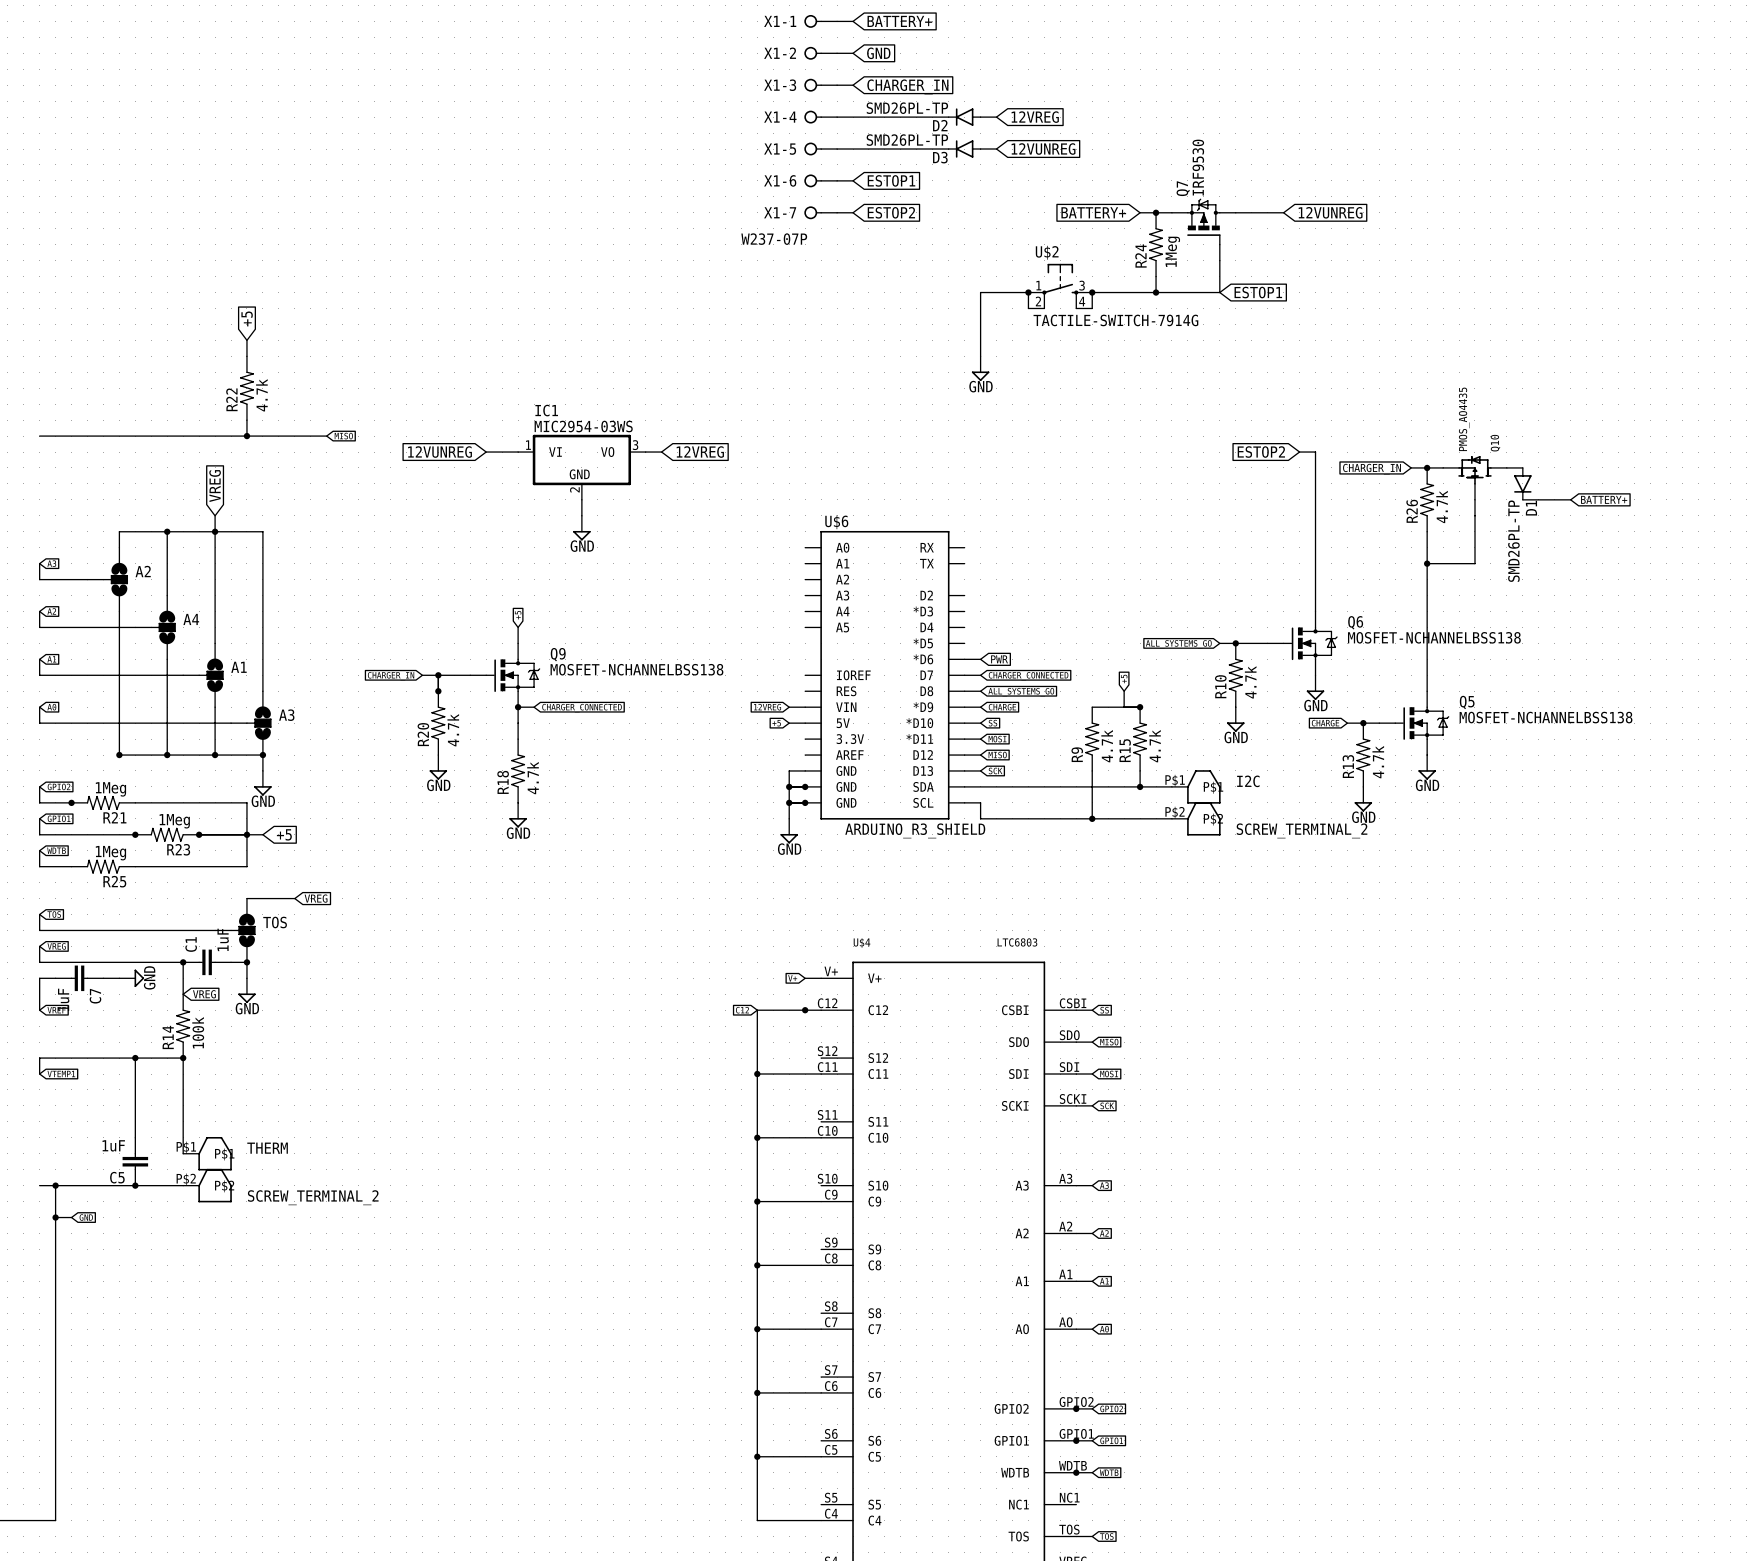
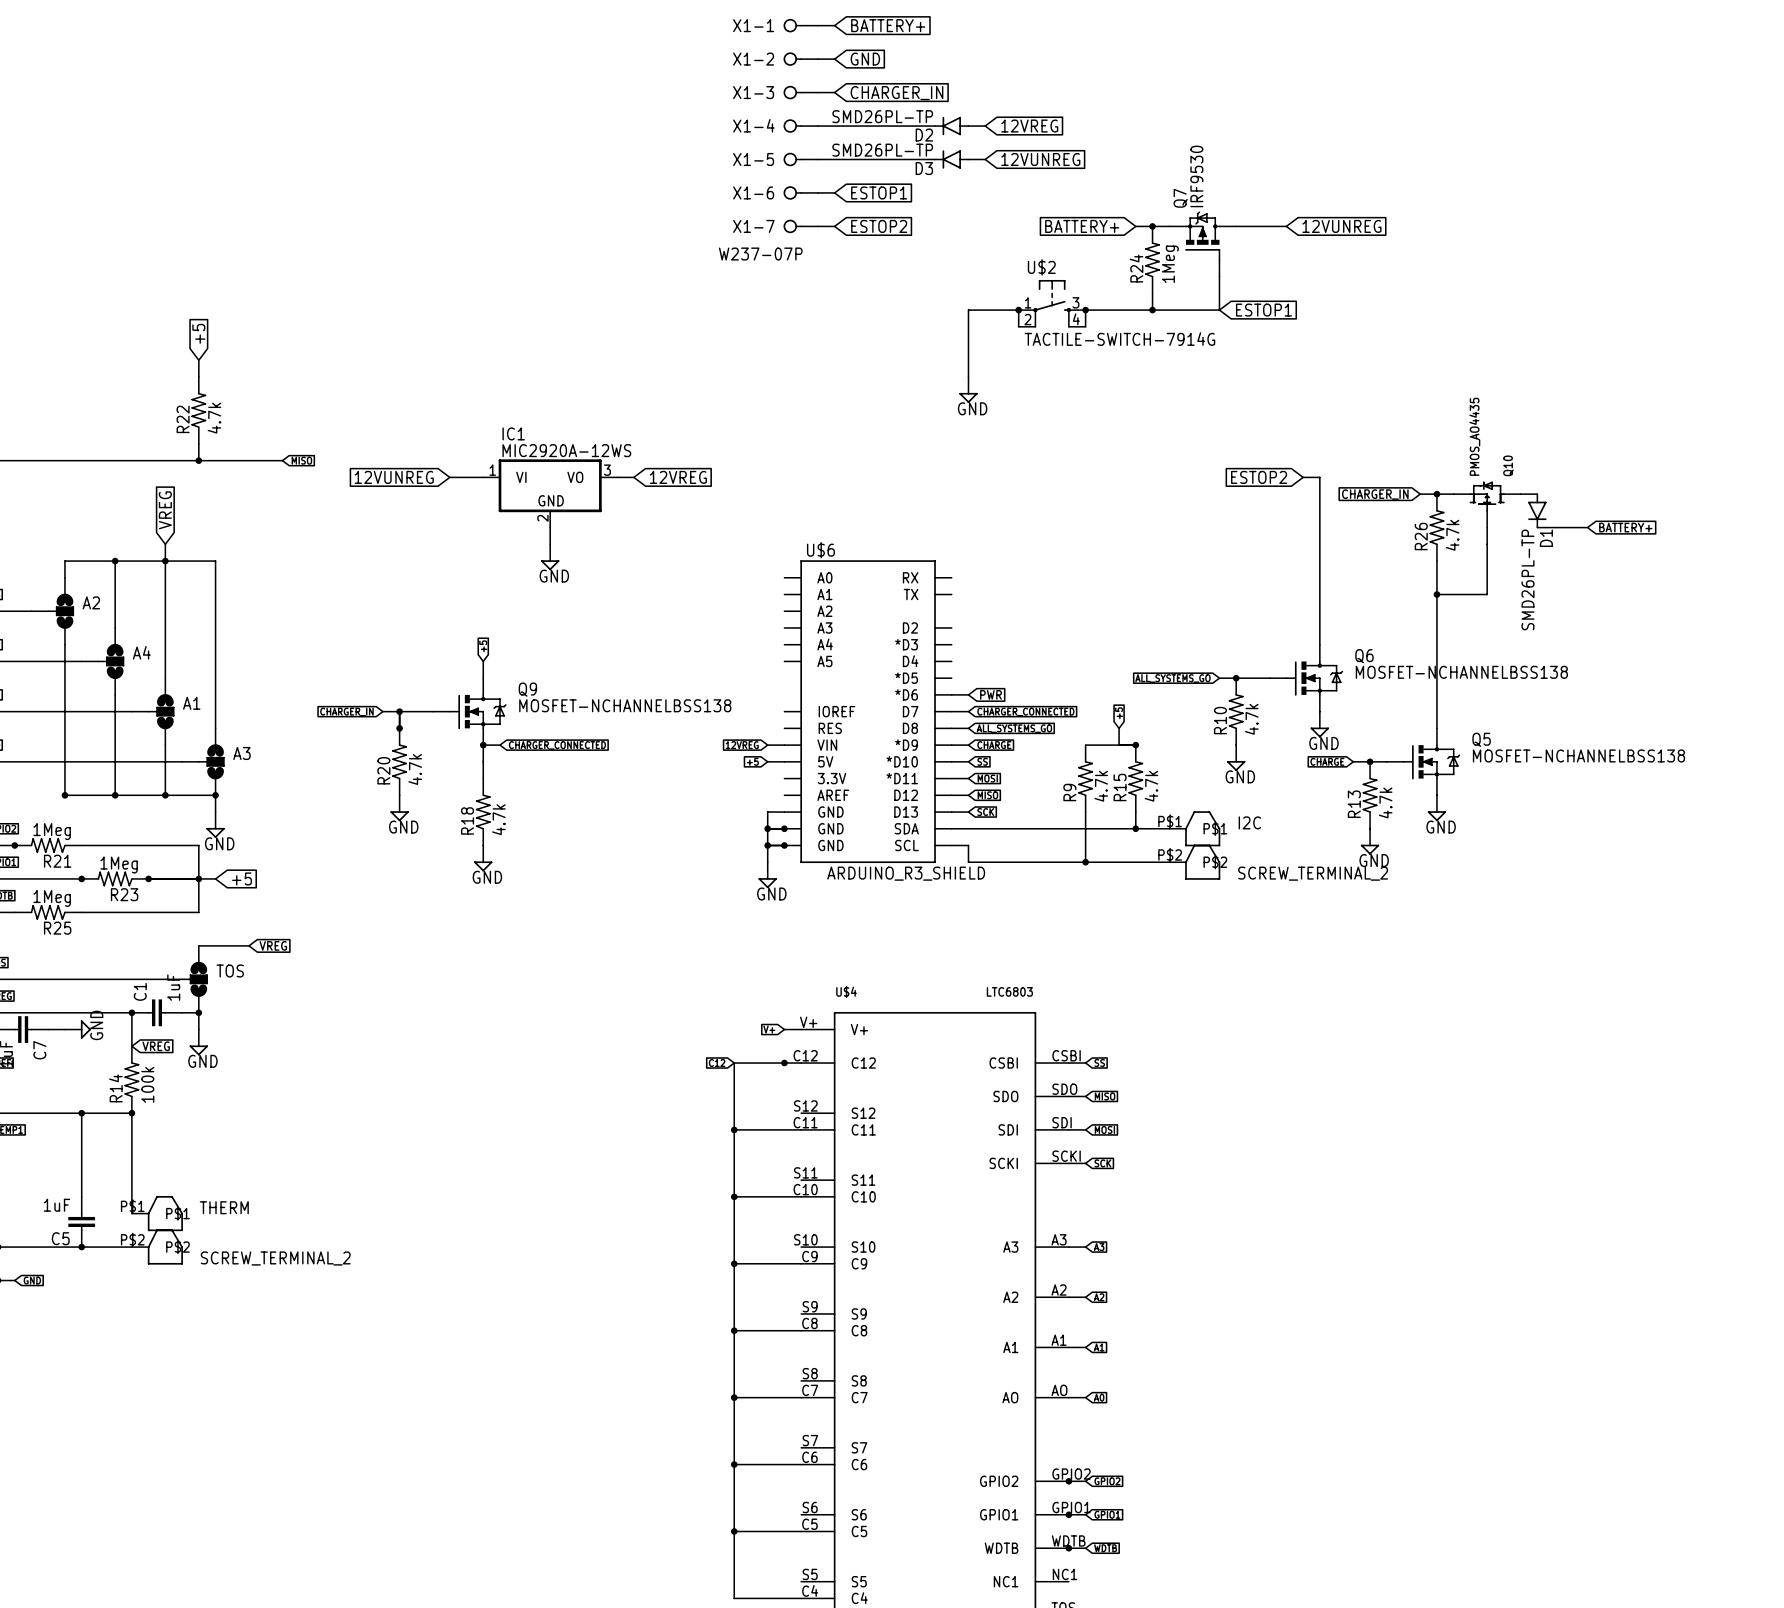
IC1 value: MIC2954-03WS (583, 426) -> MIC2920A-12WS (566, 450)

